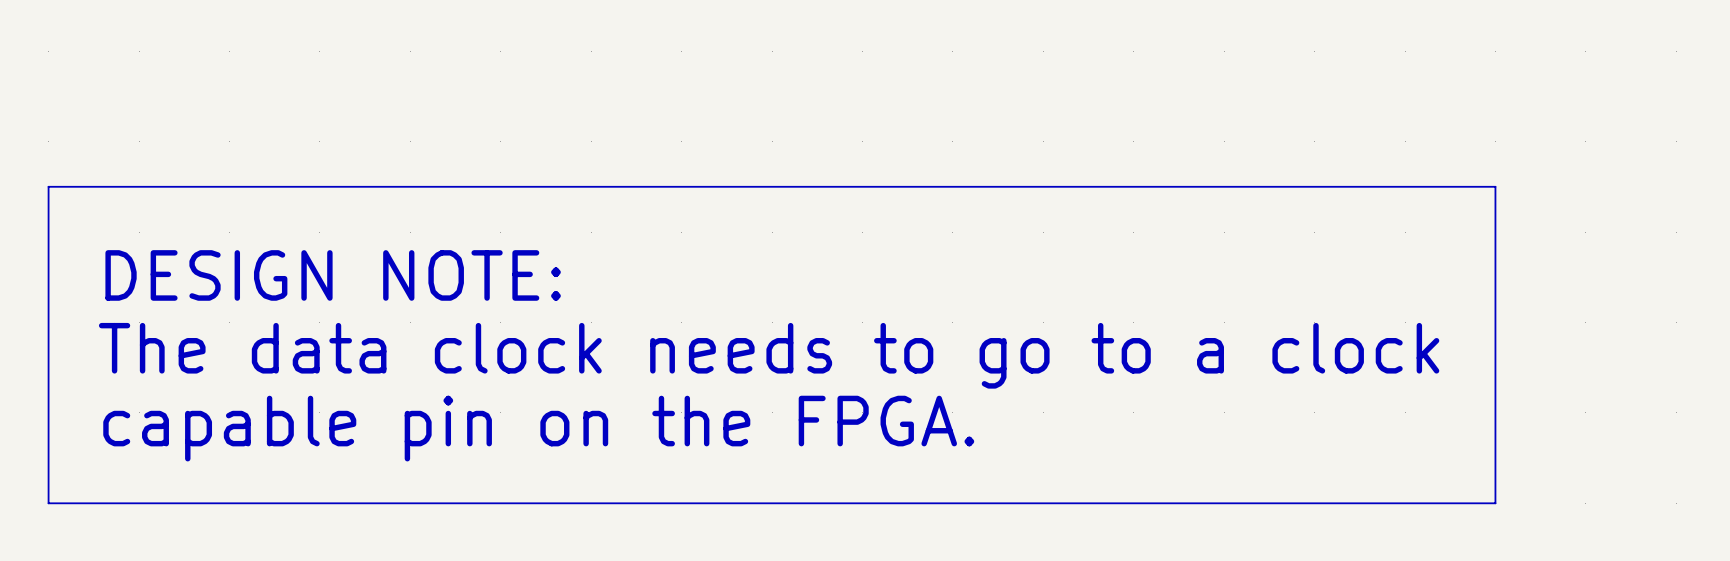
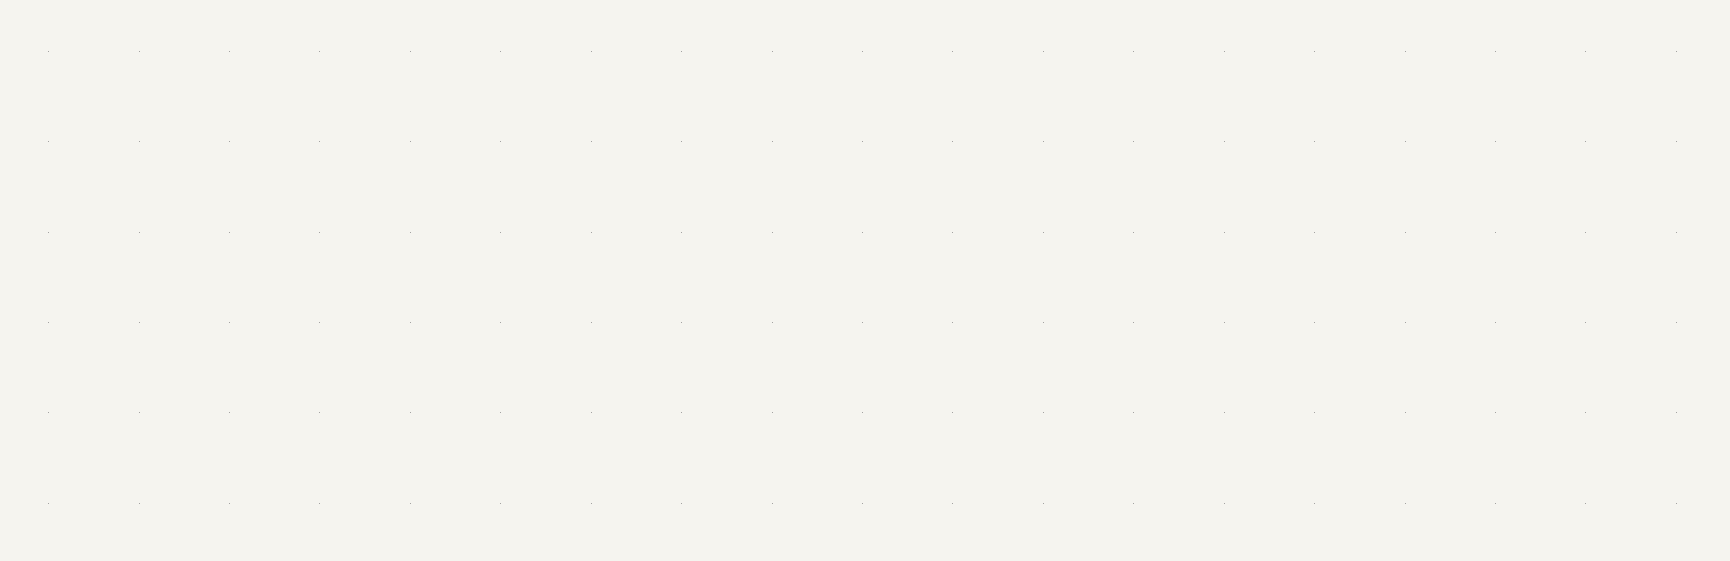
line: (48, 186) (48, 503) (1495, 503) (1495, 186) (48, 186) -> none
text: DESIGN NOTE: (333, 275) -> none
text: The data clock needs to go to a clock (769, 355) -> none
text: capable pin on the FPGA. (538, 428) -> none

